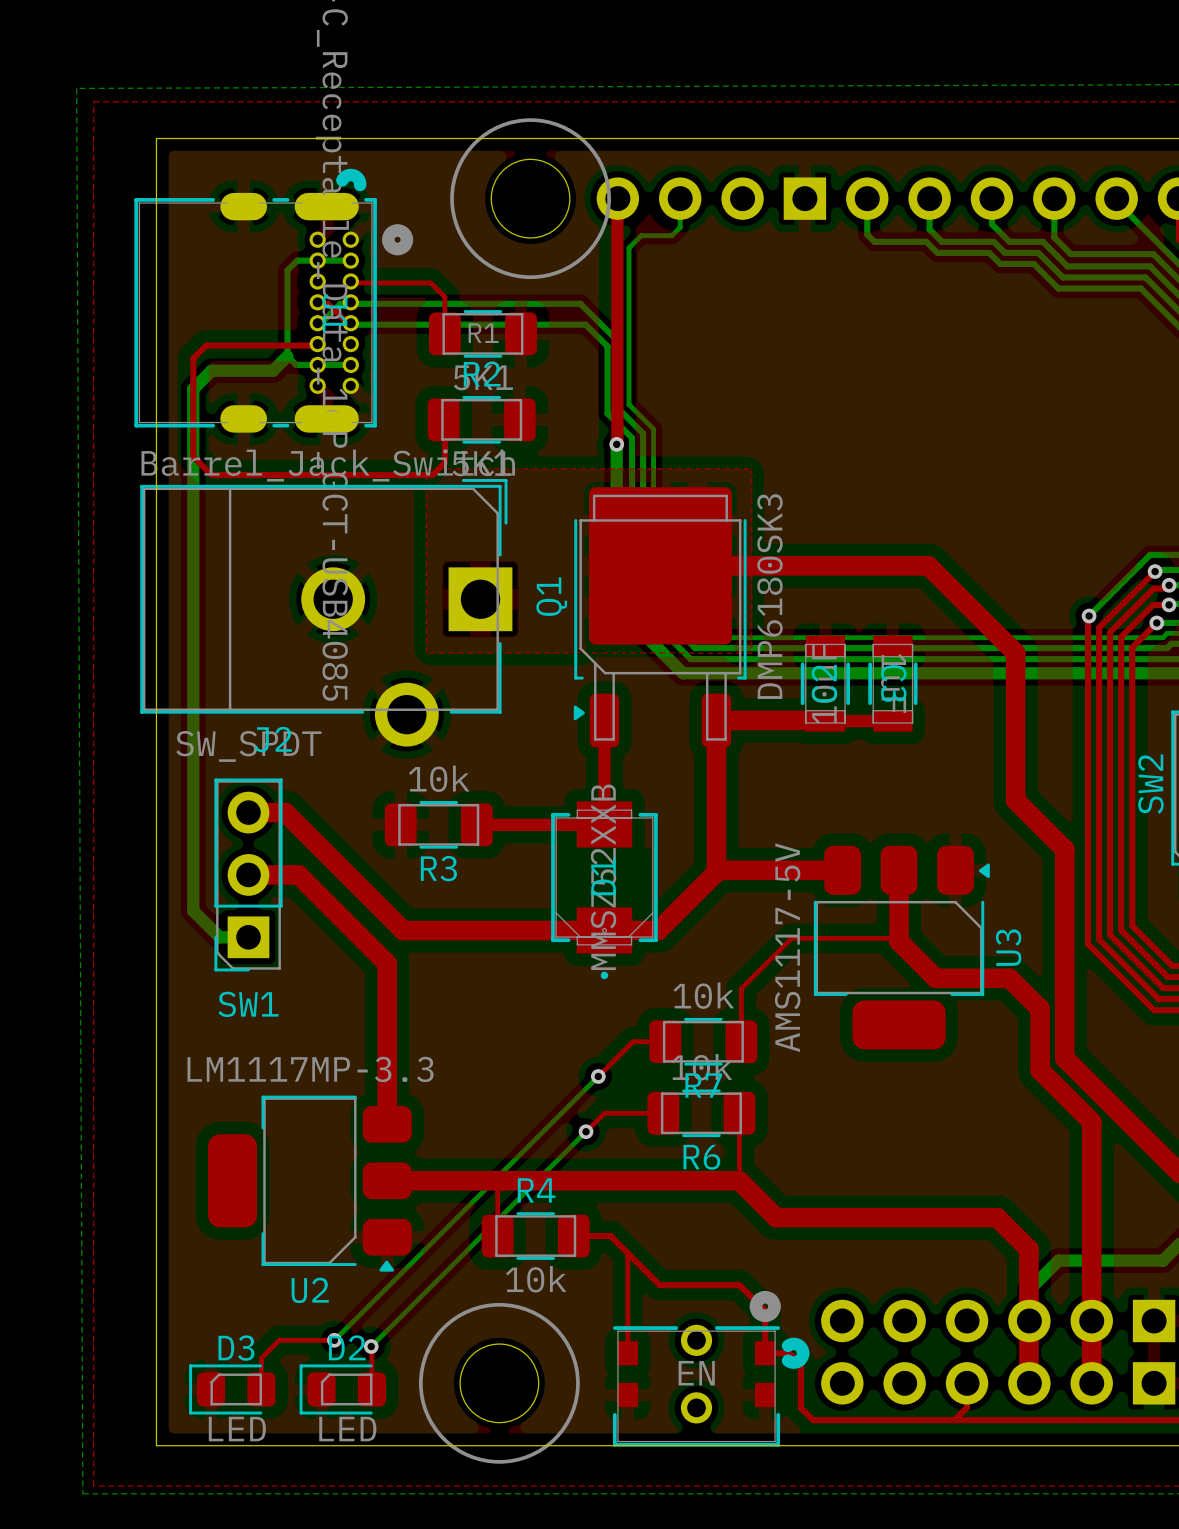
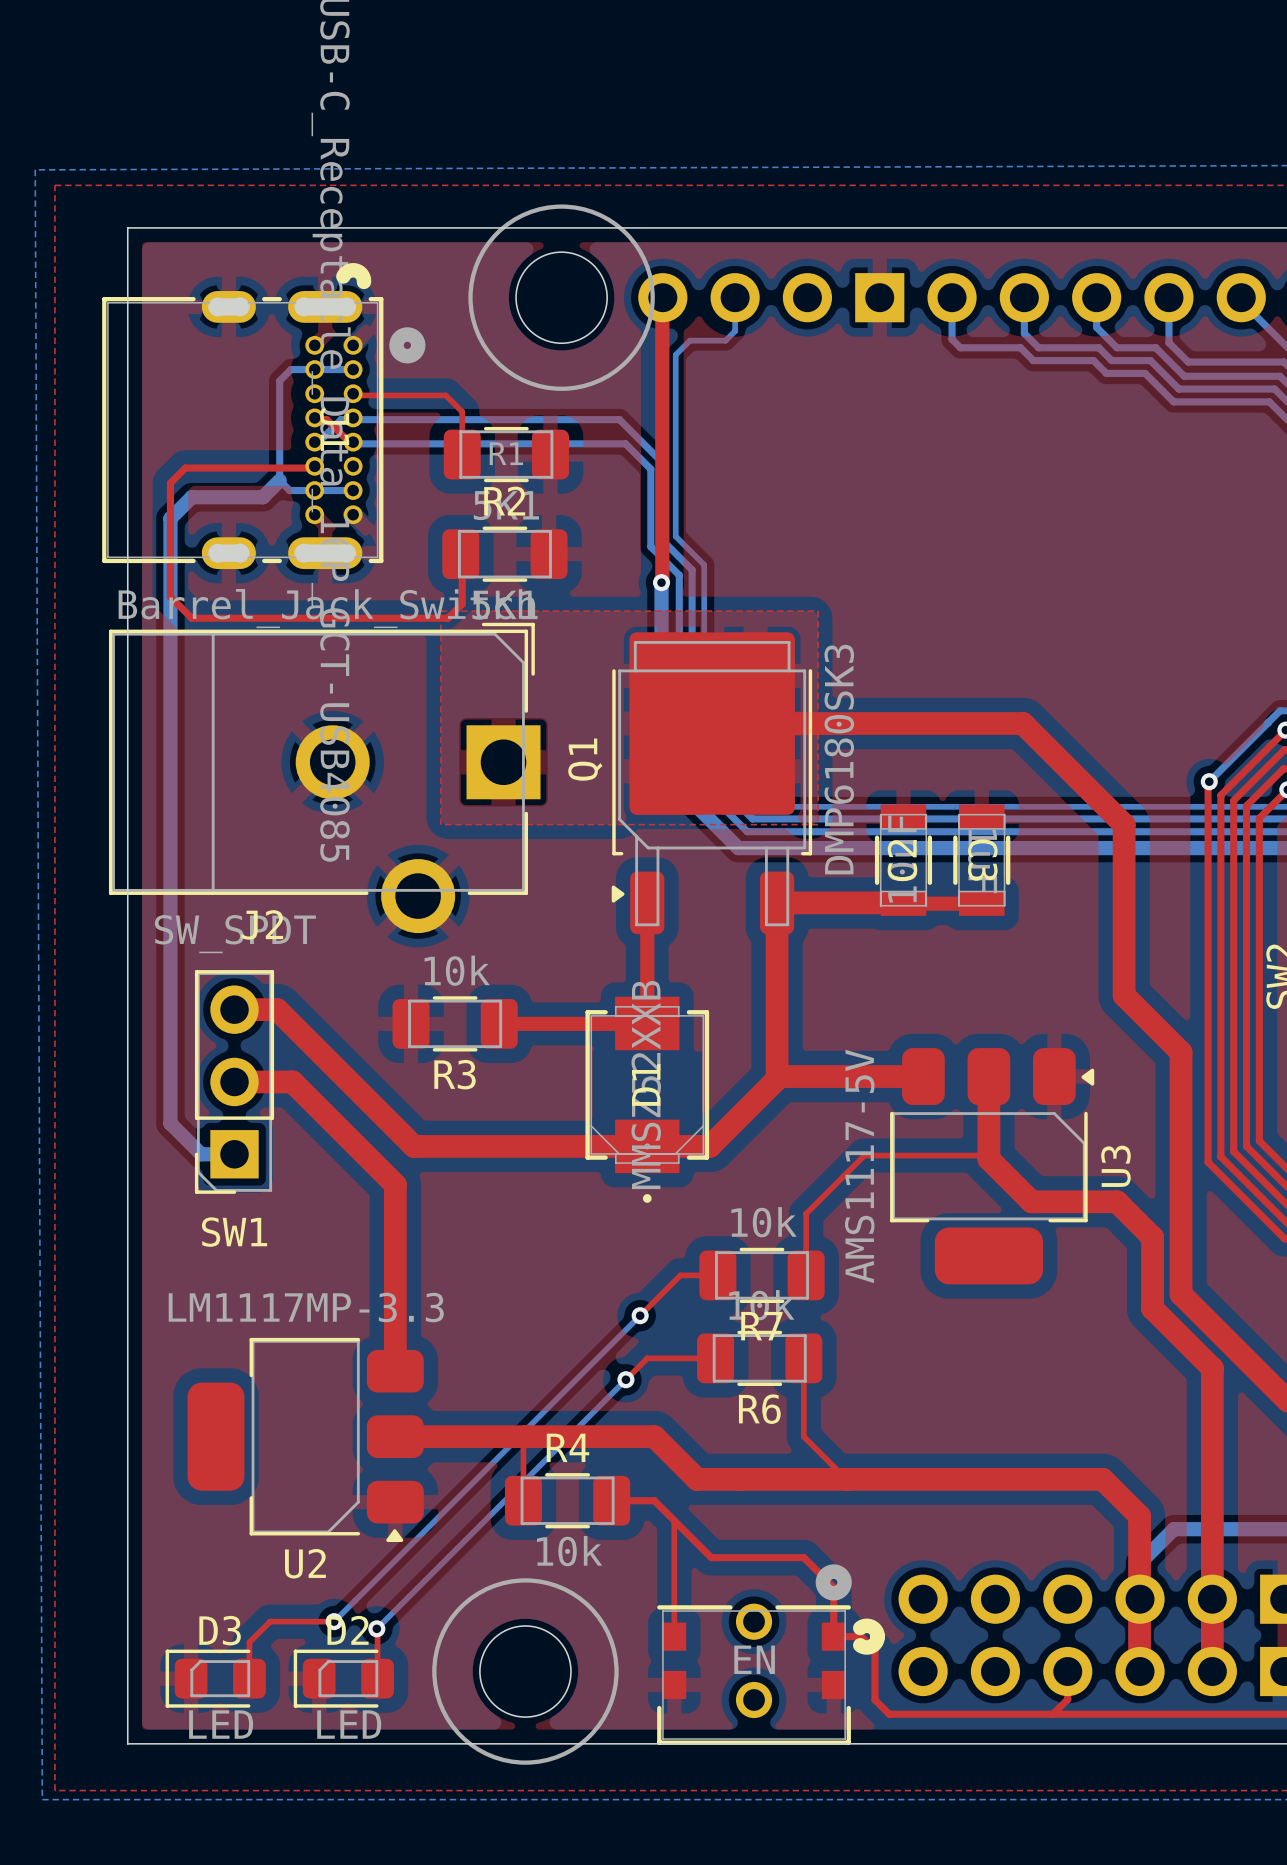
top track: (610, 1180) (739, 1180) -> (654, 1436) (697, 1479) (846, 1479)
top track width: thick (739, 1180) (776, 1217) -> thin (803, 1436) (846, 1479)

